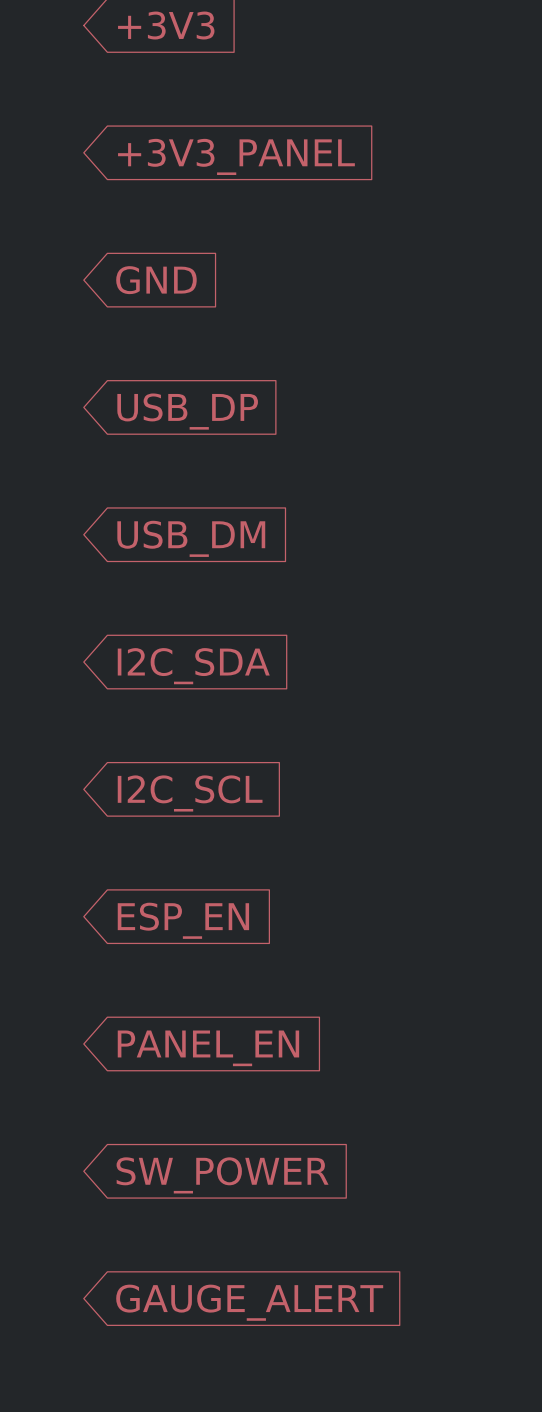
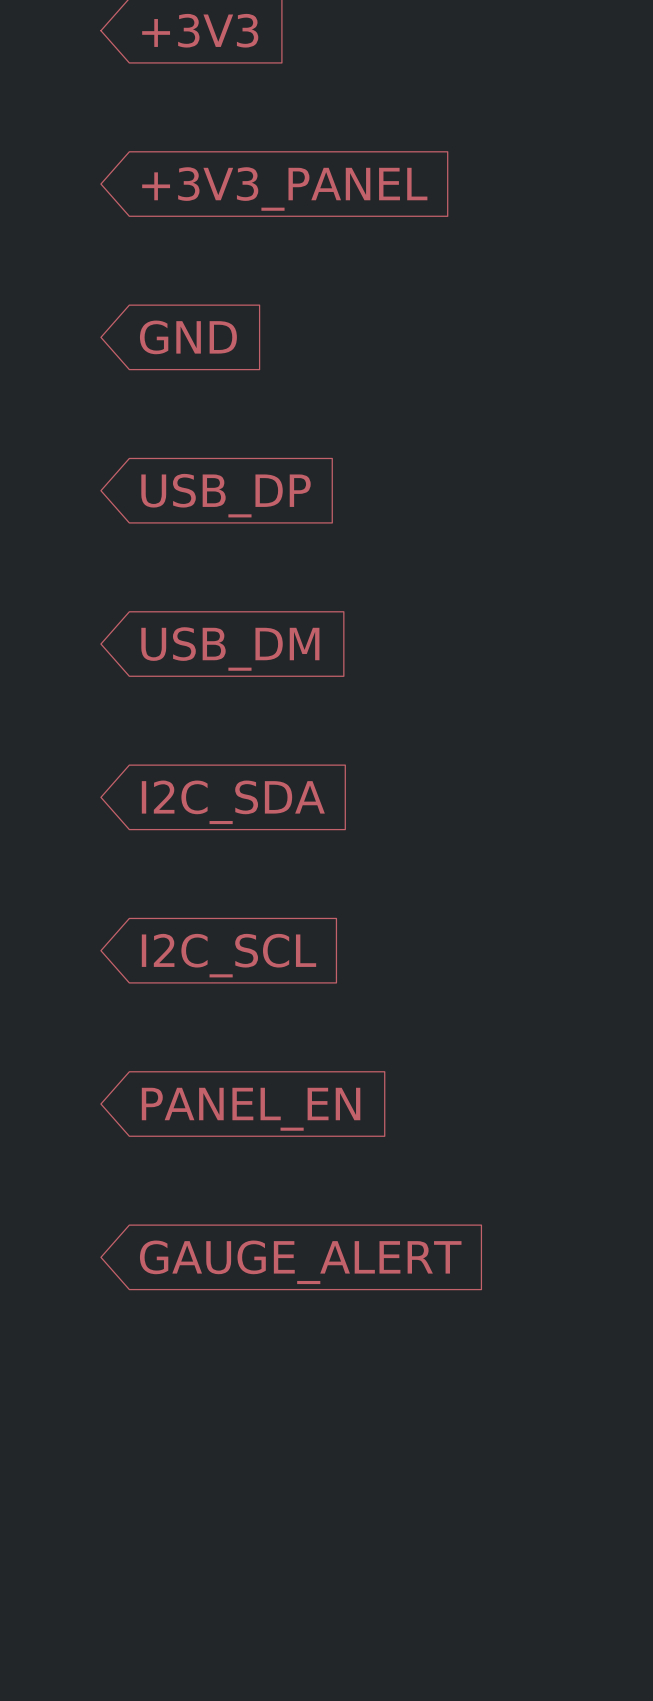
global label: ESP_EN (183, 920) -> PANEL_EN (251, 1109)
global label: PANEL_EN (208, 1048) -> GAUGE_ALERT (300, 1262)
global label: SW_POWER (222, 1175) -> none
global label: GAUGE_ALERT (249, 1302) -> none

